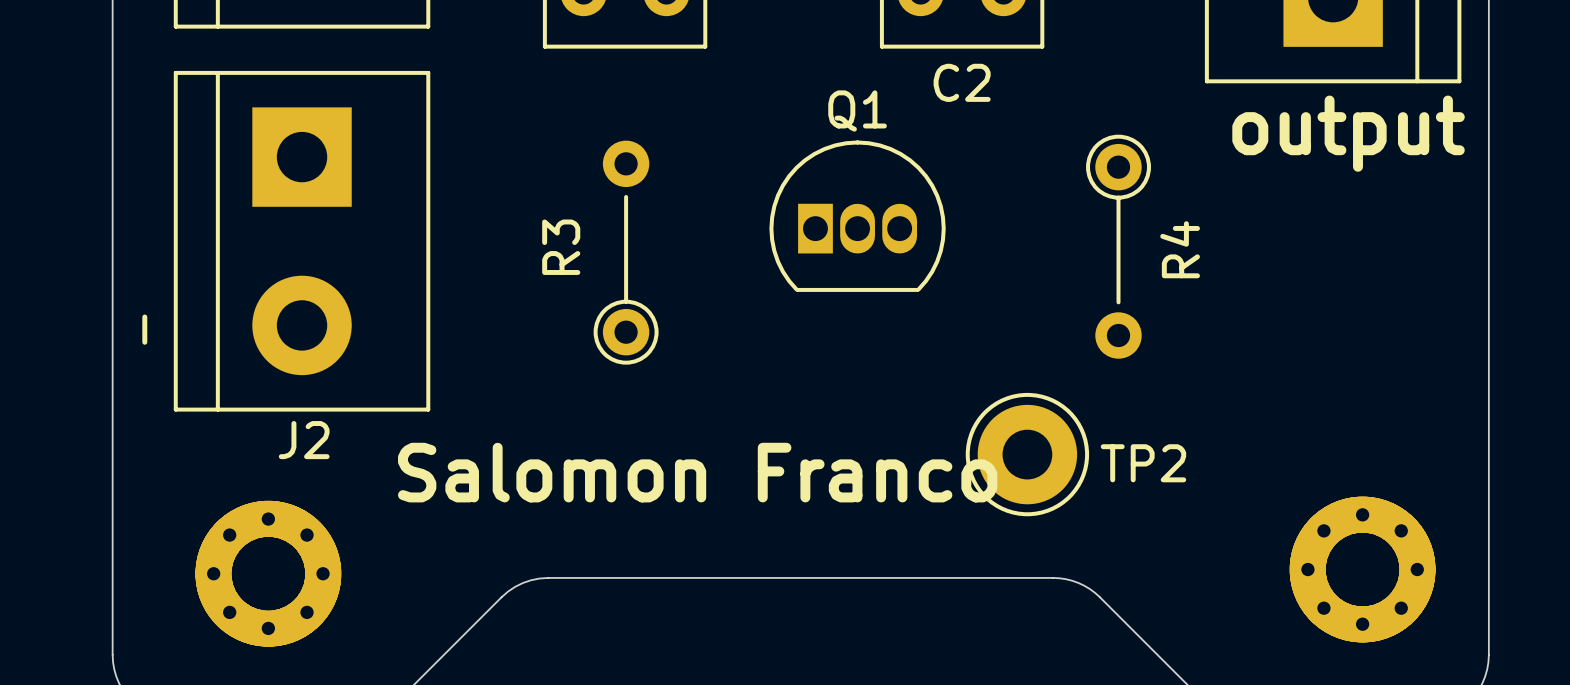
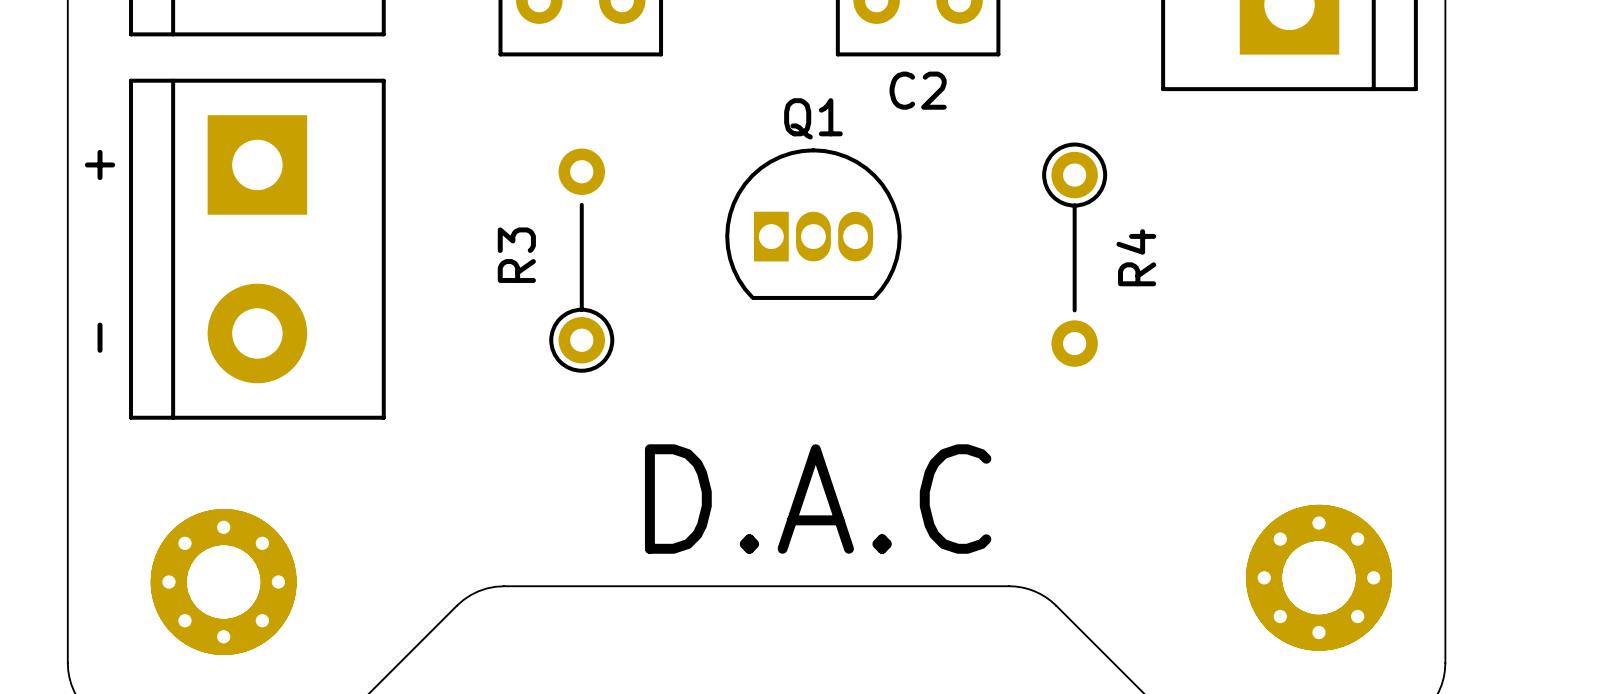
text: output (1348, 133) -> none
J2 name: J2 (304, 440) -> + (100, 164)
TP2: (1027, 454) -> none
text: Salomon Franco (697, 472) -> none
text: none -> D.A.C (818, 499)

